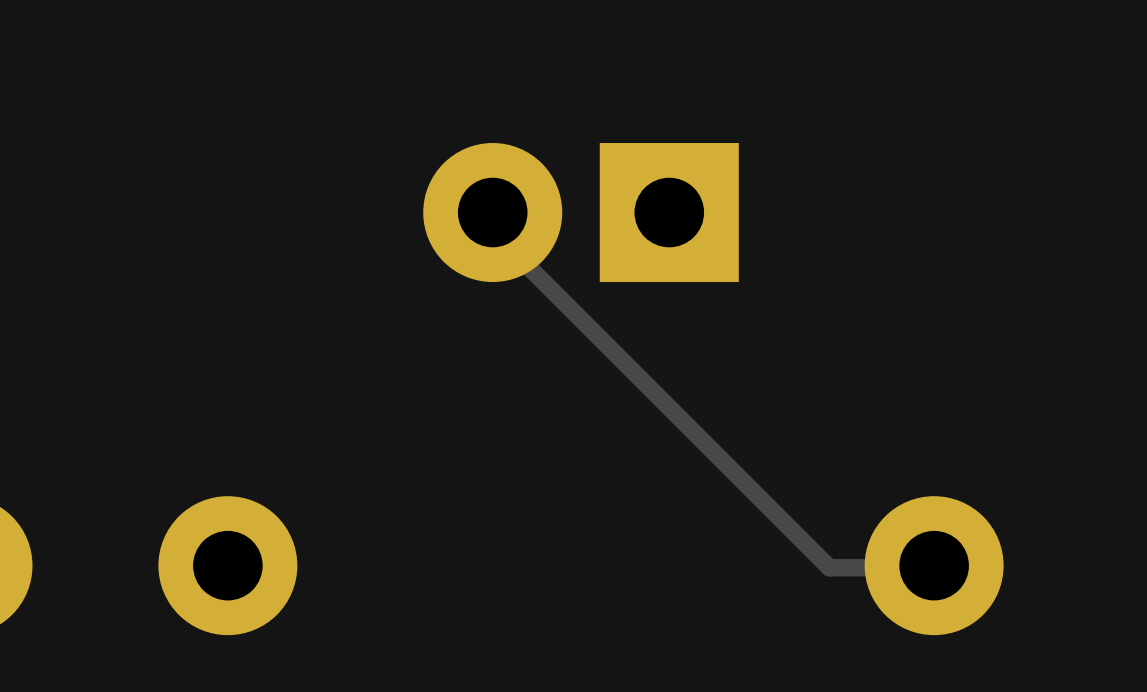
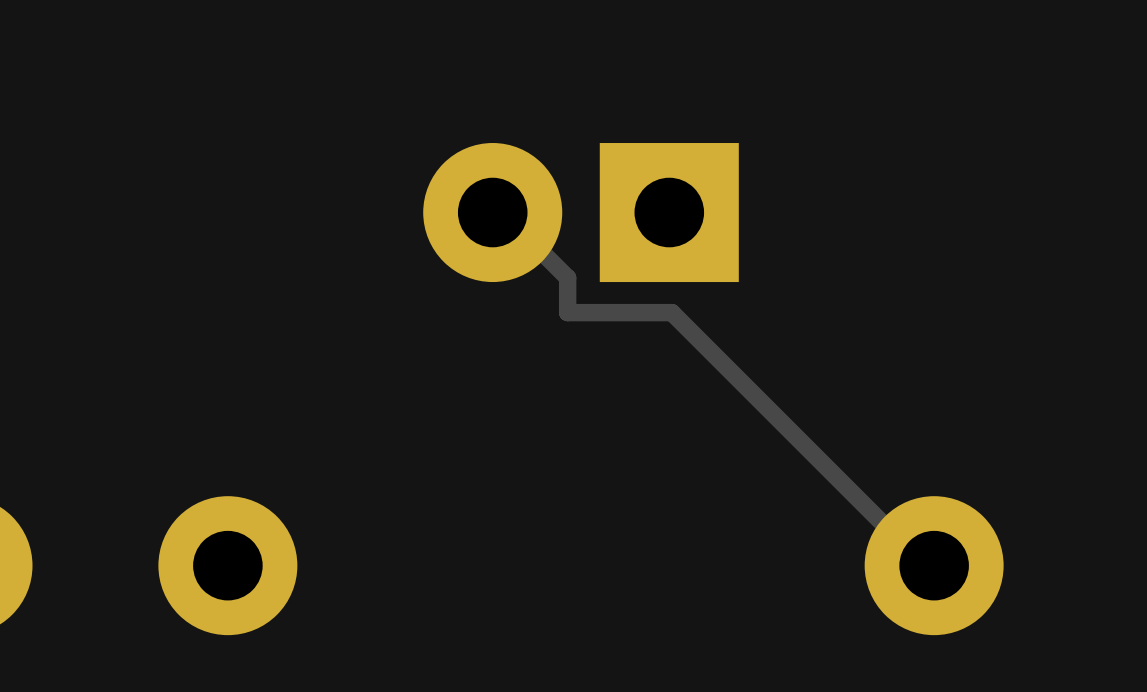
track: (492, 212) (493, 232) (829, 567) (935, 567) (934, 565) -> (492, 212) (498, 208) (567, 277) (567, 312) (671, 312) (932, 573) (934, 565)

